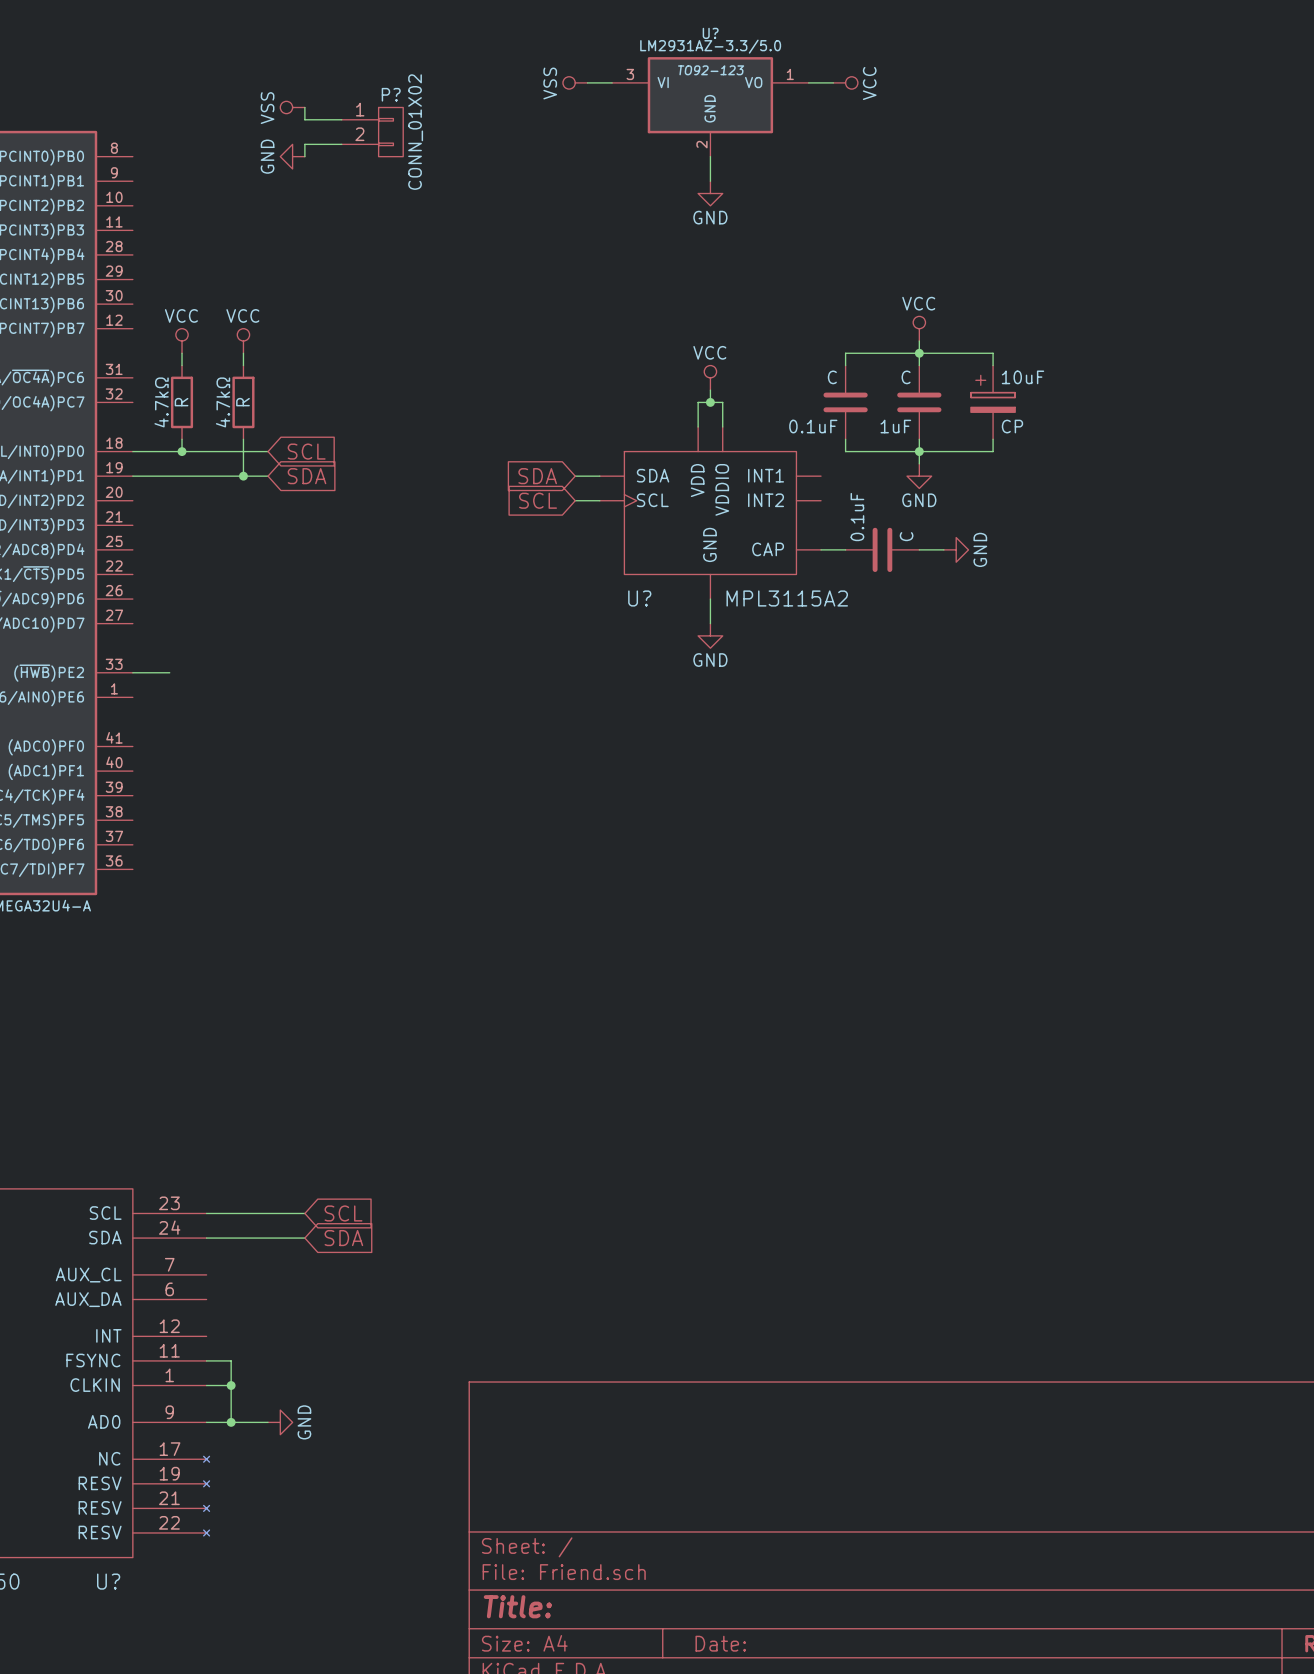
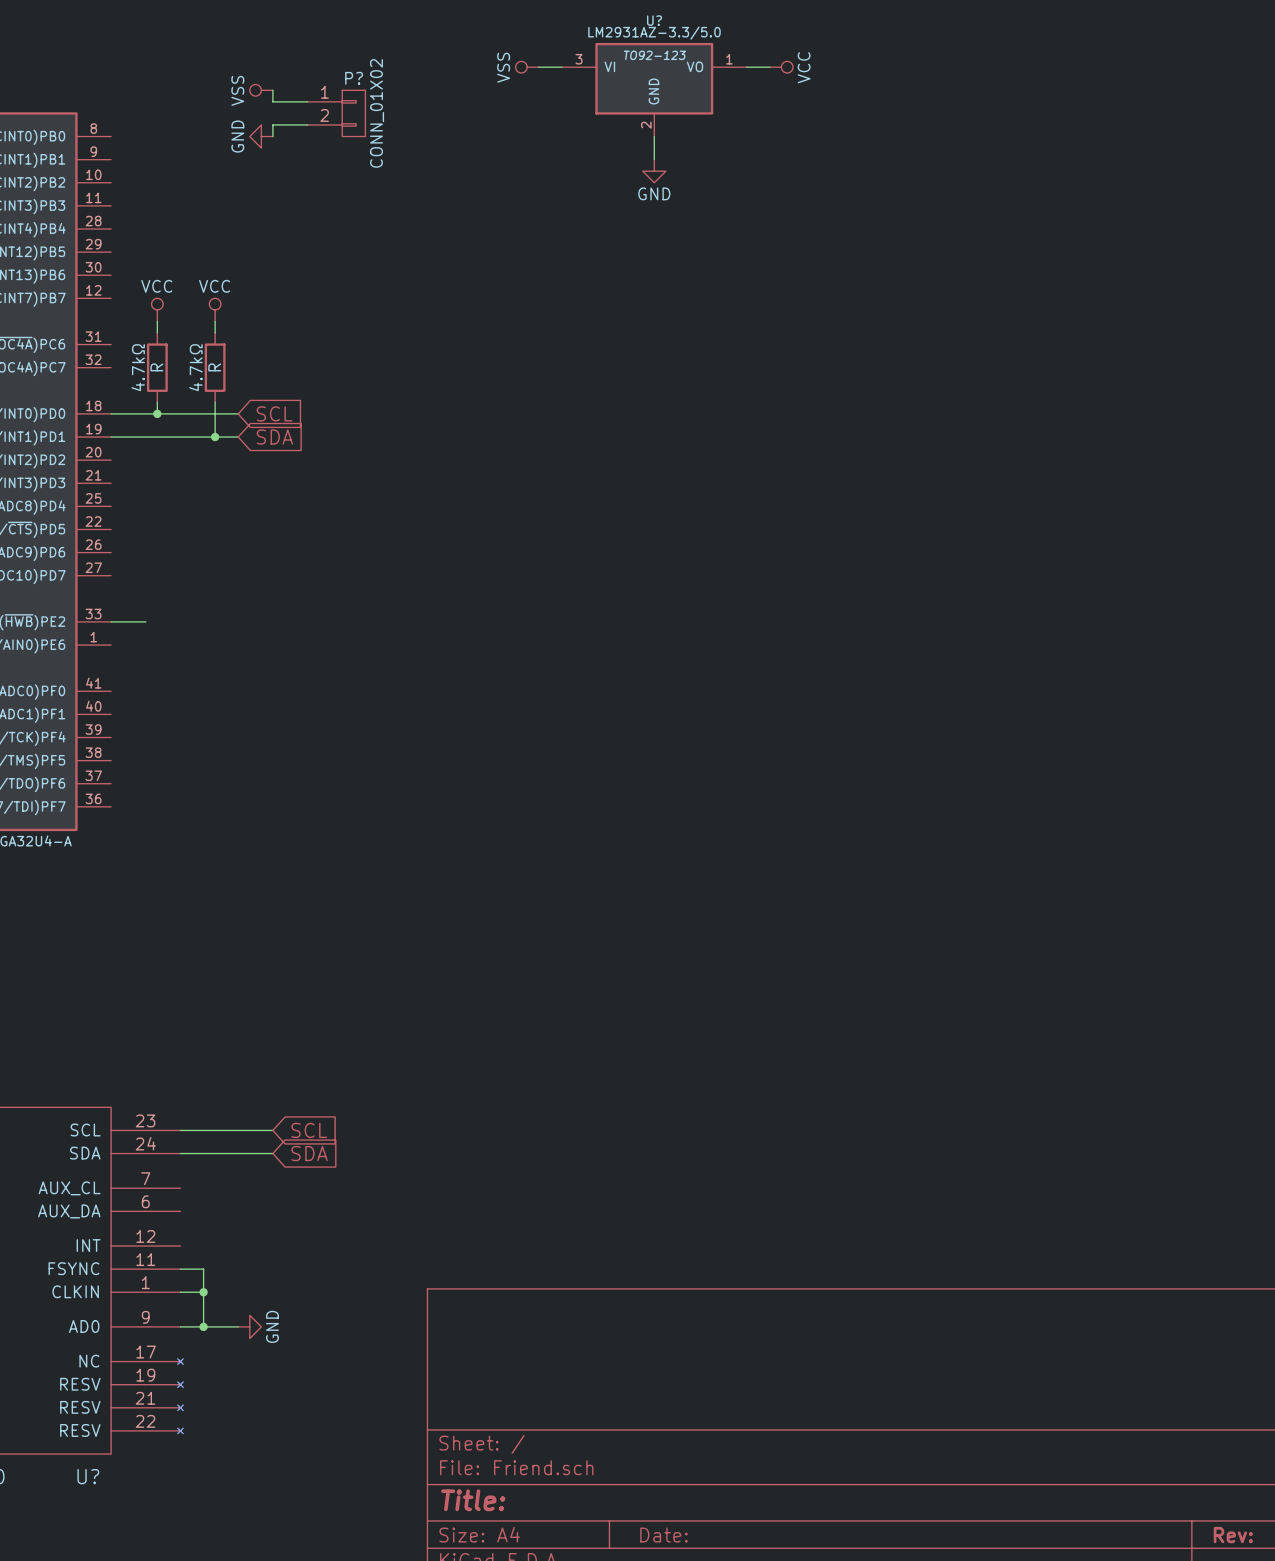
power symbol: VCC (919, 328) -> none
wire: (919, 340) (919, 365) -> none
junction: (919, 353) -> none
wire: (845, 365) (845, 353) (993, 353) (993, 365) -> none
power symbol: VCC (710, 377) -> none
wire: (710, 390) (710, 402) -> none
junction: (710, 402) -> none
0.1uF: C (845, 402) -> none
1uF: C (919, 402) -> none
10uF: CP (993, 402) -> none
wire: (698, 427) (698, 402) (722, 402) (722, 427) -> none
wire: (845, 439) (845, 451) (993, 451) (993, 439) -> none
wire: (919, 439) (919, 463) -> none
junction: (919, 451) -> none
global label: SDA (537, 476) -> none
wire: (575, 476) (599, 476) -> none
power symbol: GND (919, 476) -> none
global label: SCL (538, 500) -> none
wire: (575, 500) (599, 500) -> none
U?: MPL3115A2 (710, 513) -> none
wire: (821, 549) (845, 549) -> none
0.1uF: C (882, 549) -> none
wire: (919, 549) (943, 549) -> none
power symbol: GND (956, 549) -> none
wire: (710, 599) (710, 623) -> none
power symbol: GND (710, 635) -> none

